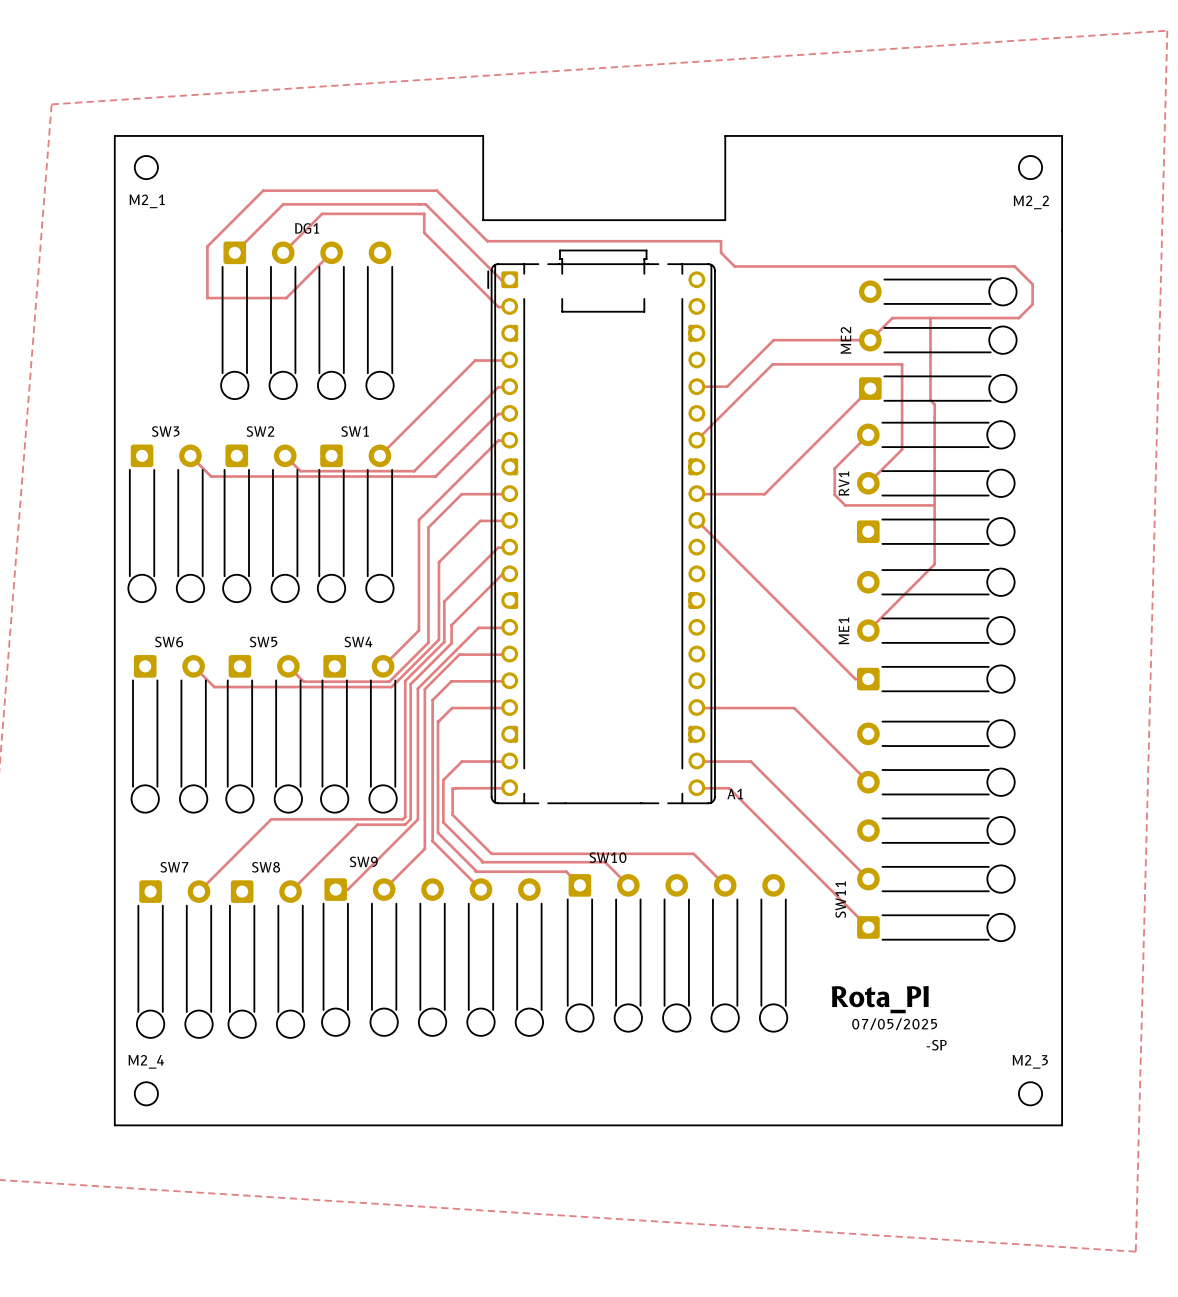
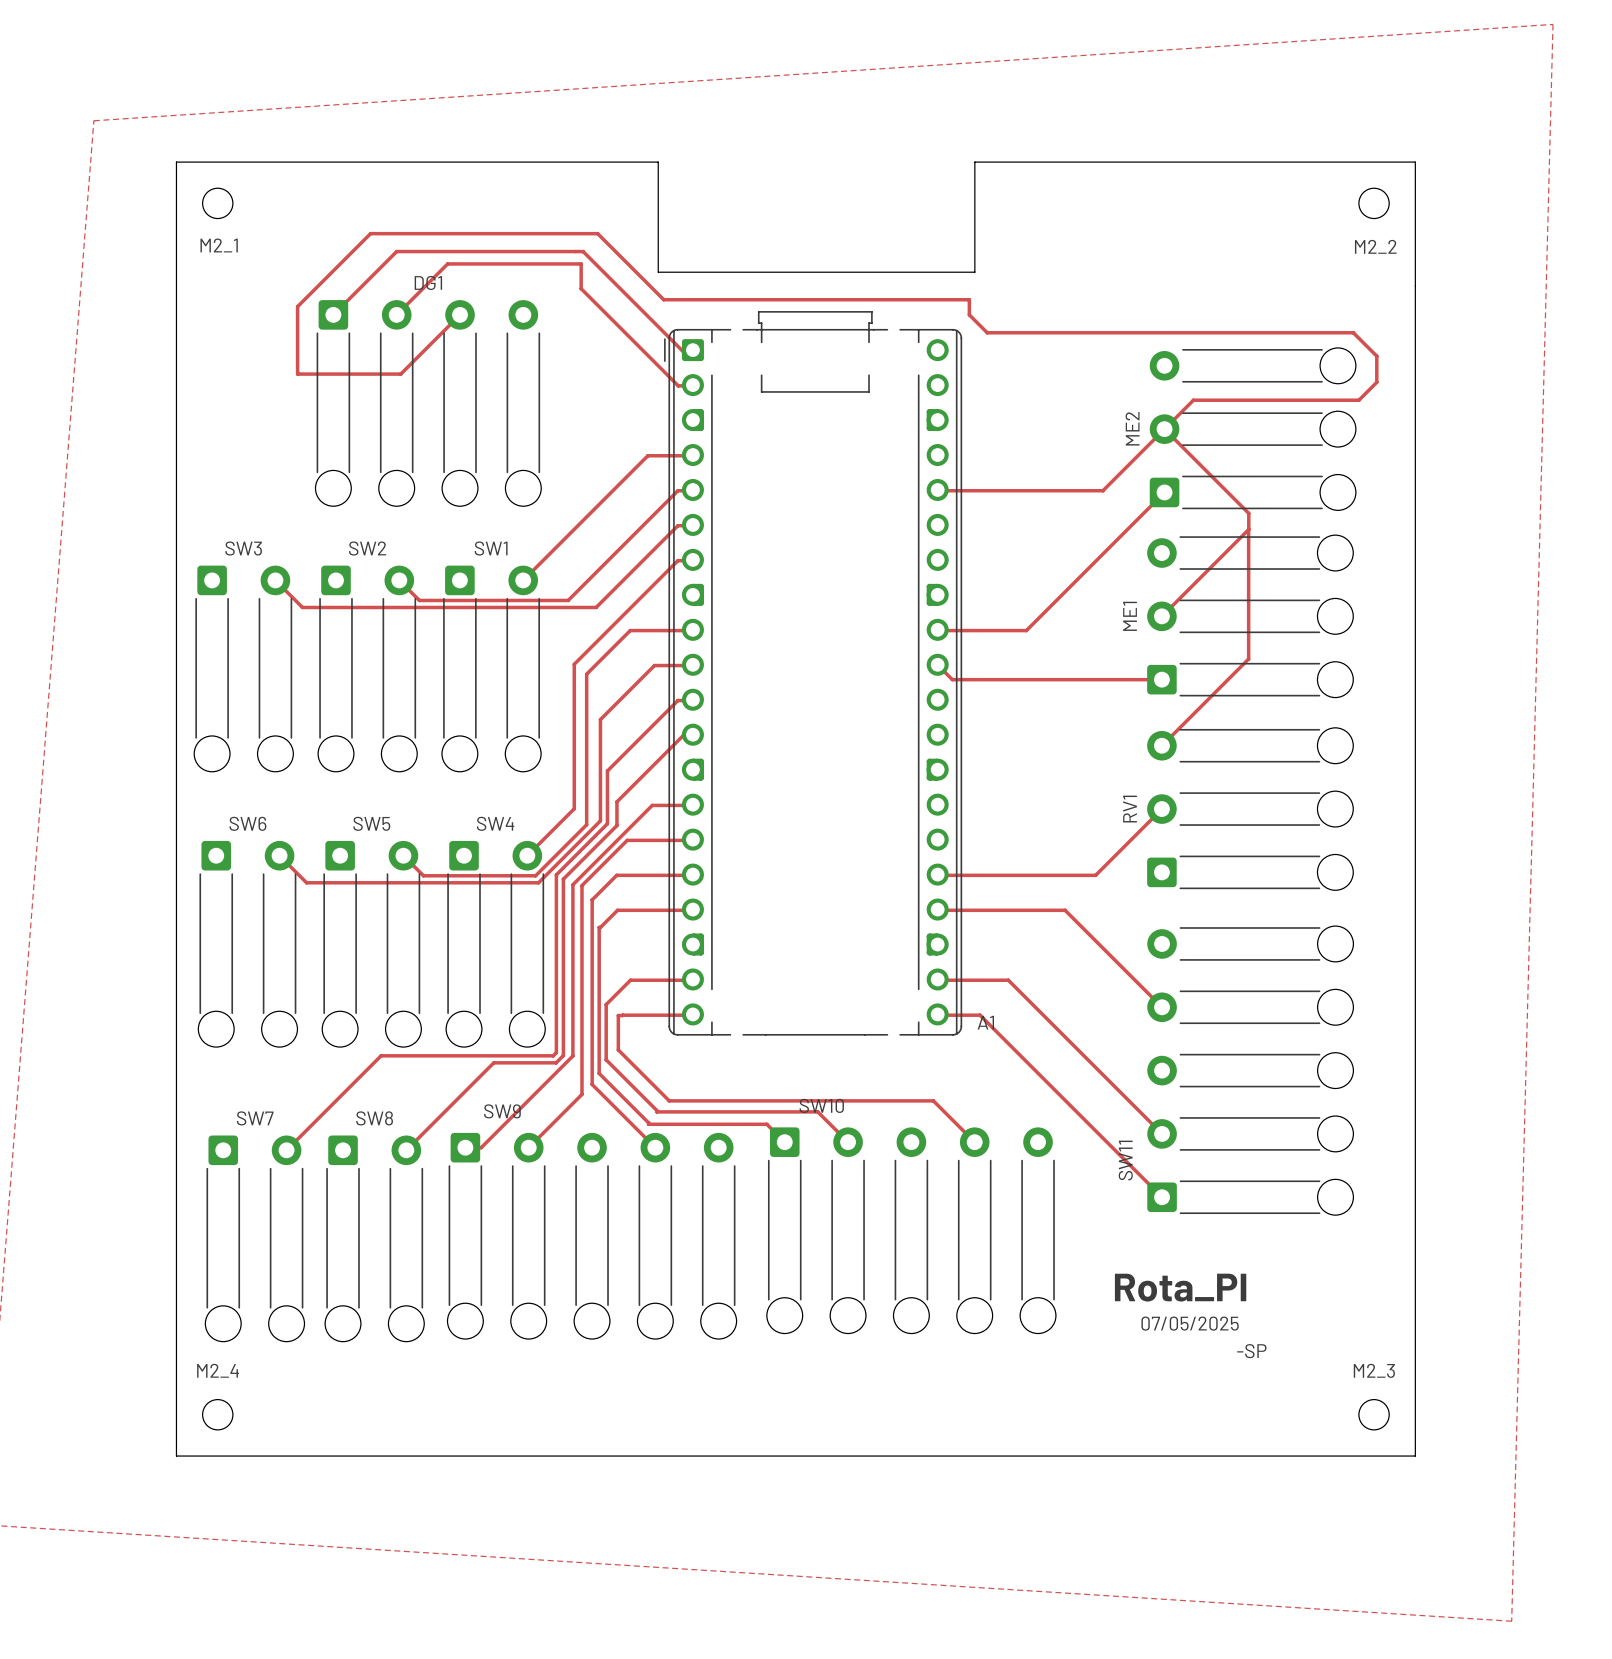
top track: (930, 318) (930, 400) -> (938, 490) (1102, 490) (1164, 429) (1243, 507)
top track: (870, 340) (773, 340) (727, 386) (696, 386) -> none
top track: (868, 434) (834, 468) (834, 494) (845, 505) (934, 505) -> none
top track: (696, 440) (772, 364) (902, 364) (902, 449) -> (1248, 529) (1206, 572)
RV1 name: RV1 (843, 483) -> ME1 (1130, 616)
top track: (934, 515) (934, 564) (868, 630) -> (1248, 659) (1161, 745)
top track: (708, 531) (855, 679) (868, 679) -> (952, 679) (1161, 679)
ME1 name: ME1 (843, 630) -> RV1 (1130, 809)
top track: none -> (1161, 809) (1095, 875) (938, 875)

